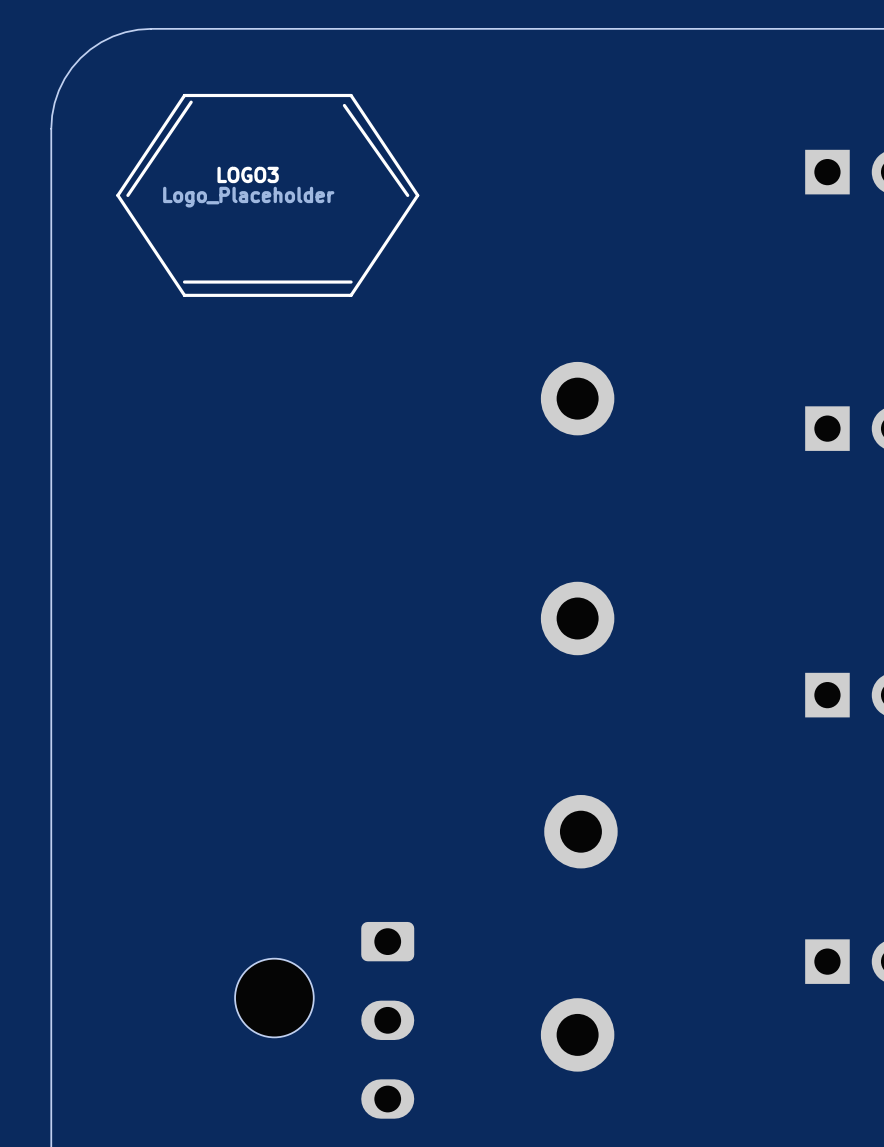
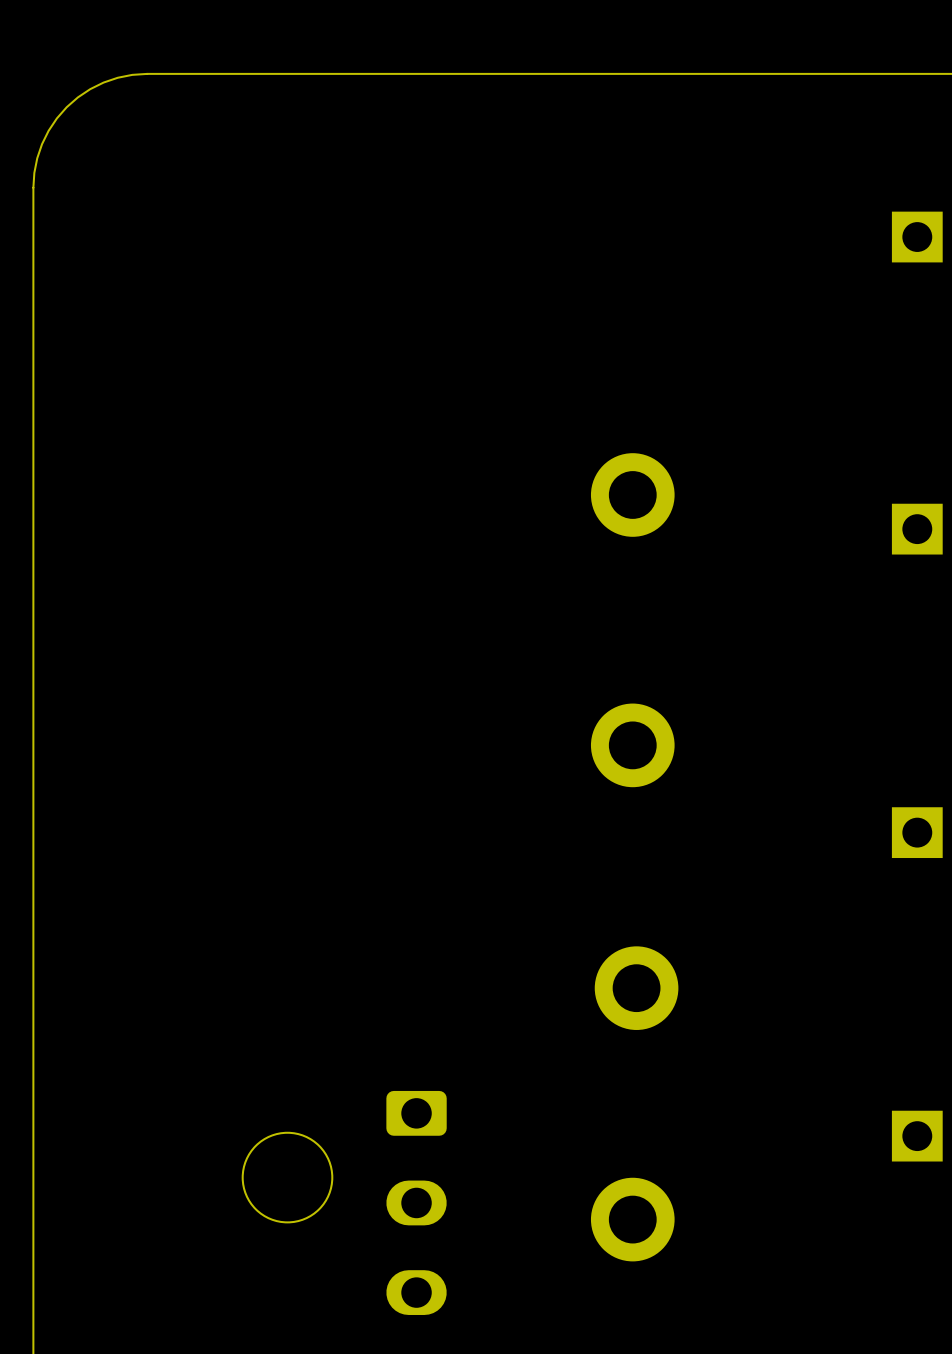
LOGO3: Logo_Placeholder (267, 195) -> none

